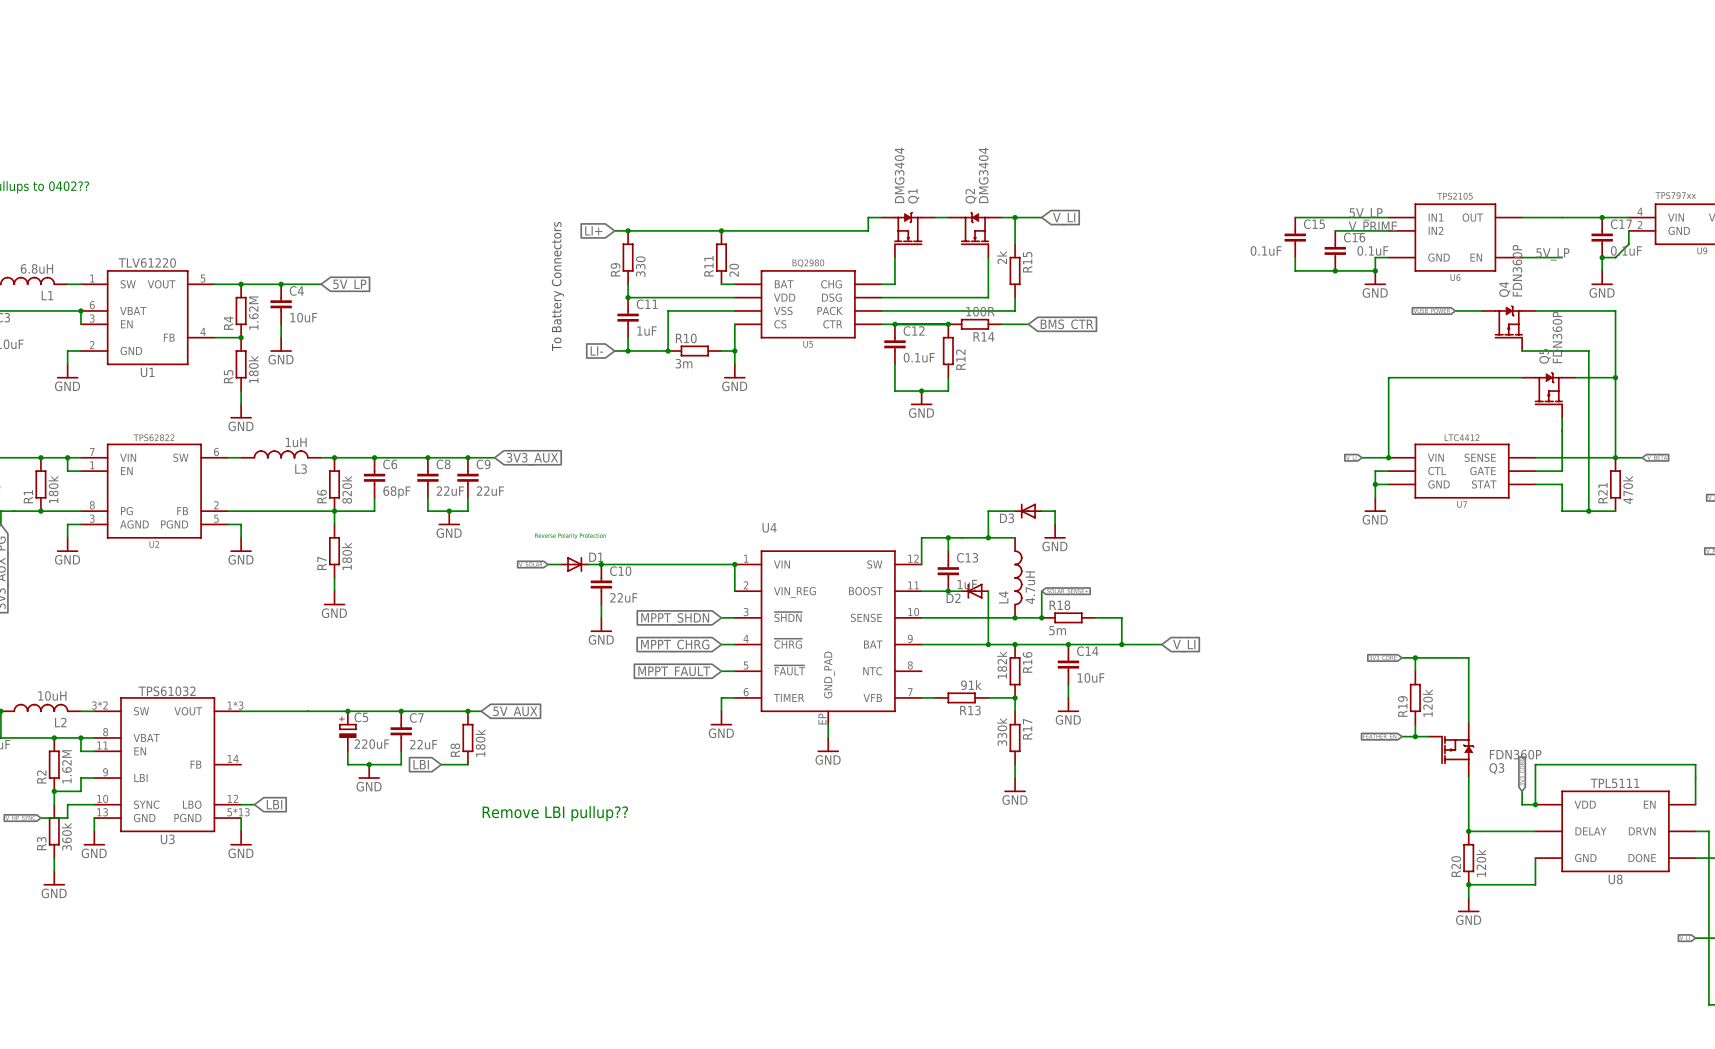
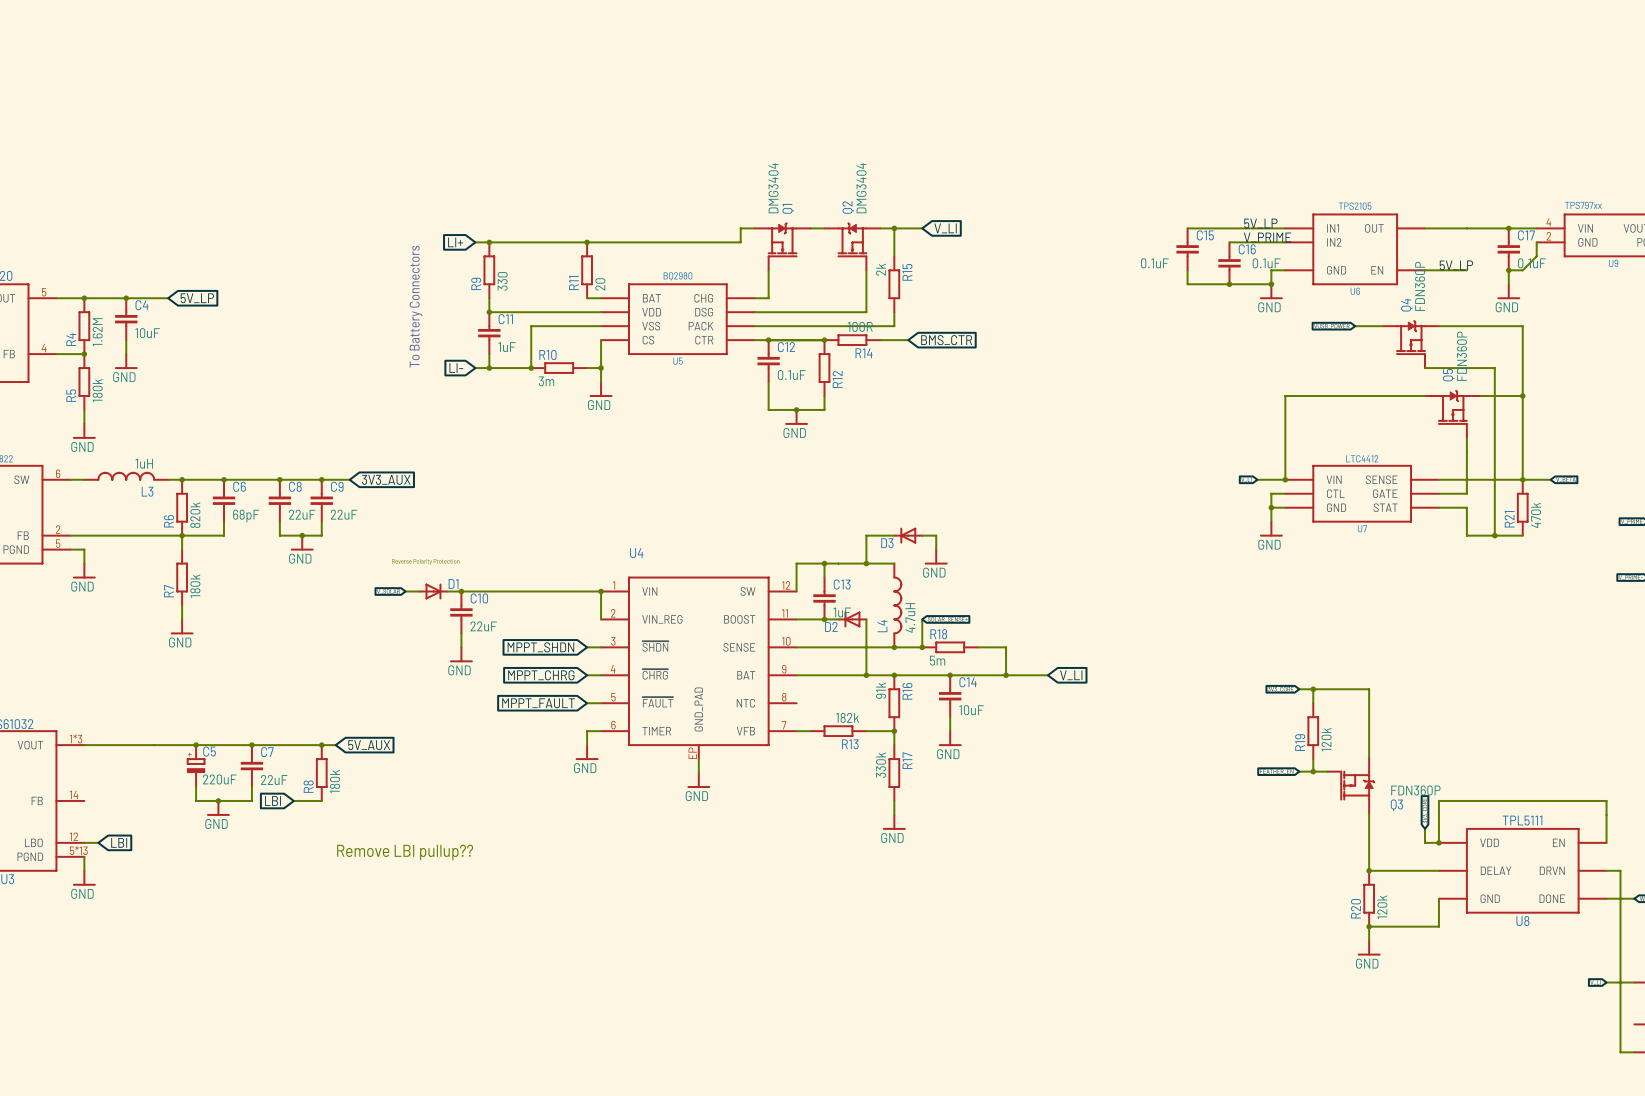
R16 value: 182k (1002, 664) -> 91k (881, 690)
R13 value: 91k (971, 685) -> 182k (847, 717)

